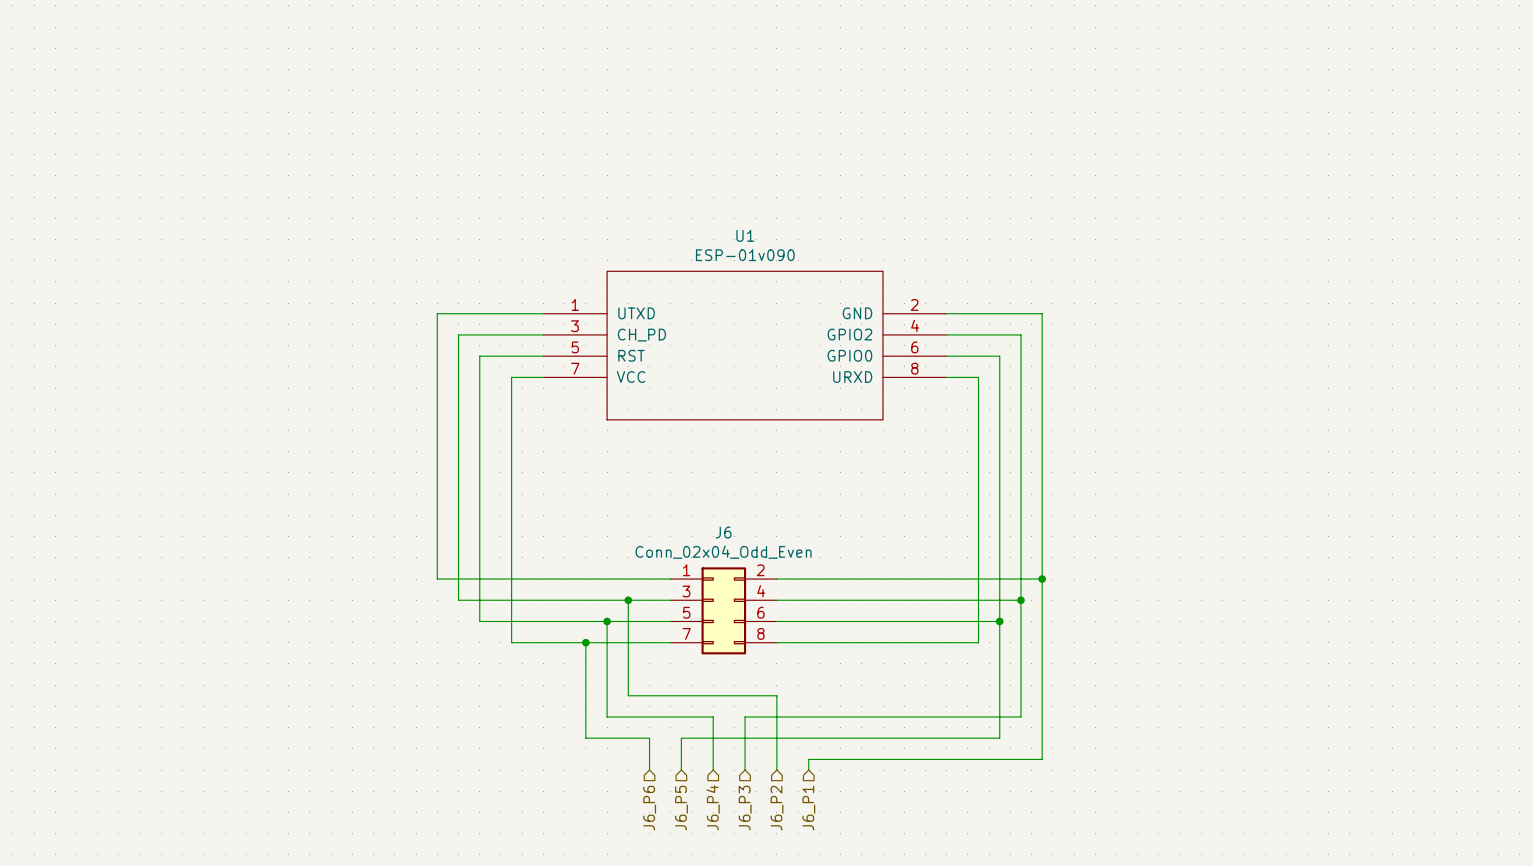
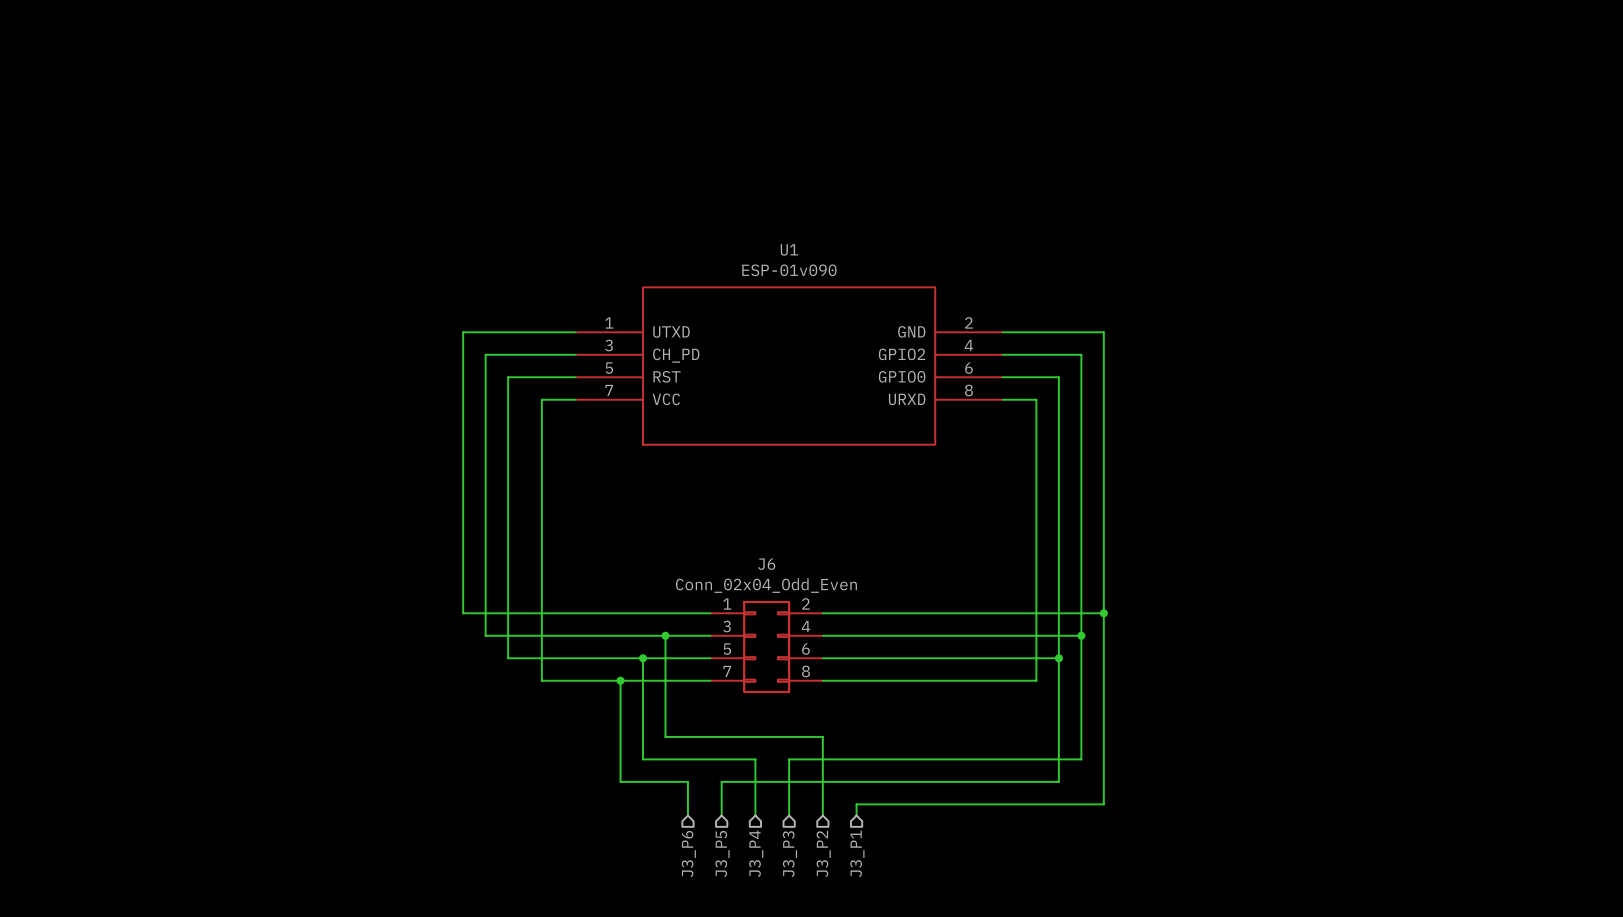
hierarchical label: J6_P4 (713, 807) -> J3_P4 (756, 853)
hierarchical label: J6_P6 (649, 808) -> J3_P6 (688, 853)
hierarchical label: J6_P5 (681, 808) -> J3_P5 (722, 853)
hierarchical label: J6_P3 (745, 808) -> J3_P3 (789, 854)
hierarchical label: J6_P2 (776, 808) -> J3_P2 (823, 853)
hierarchical label: J6_P1 (808, 808) -> J3_P1 (857, 853)

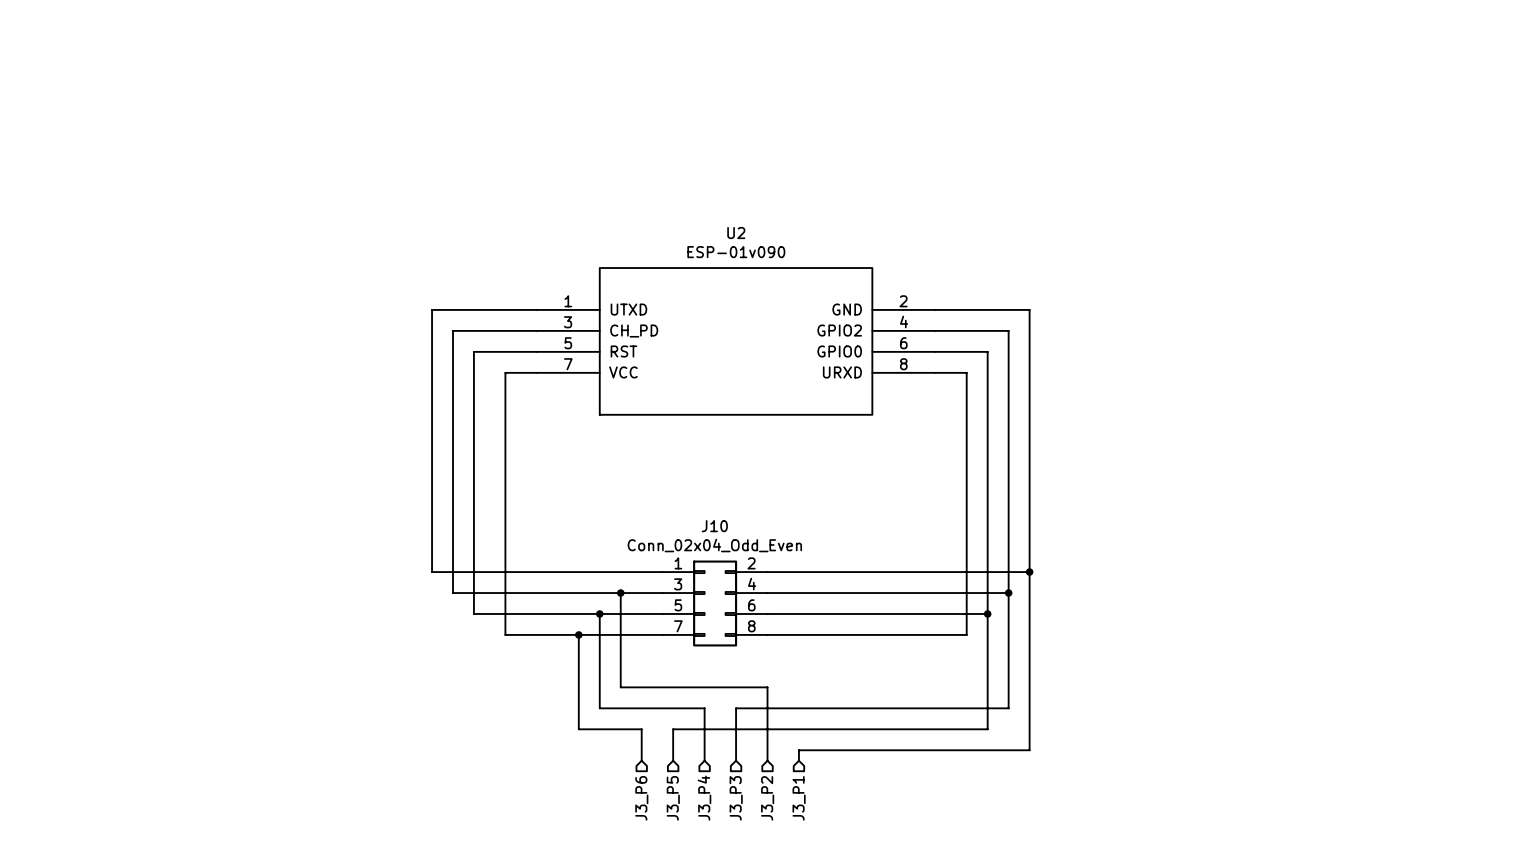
U1 name: U1 (789, 249) -> U2 (736, 233)
J6 name: J6 (766, 564) -> J10 (714, 526)

